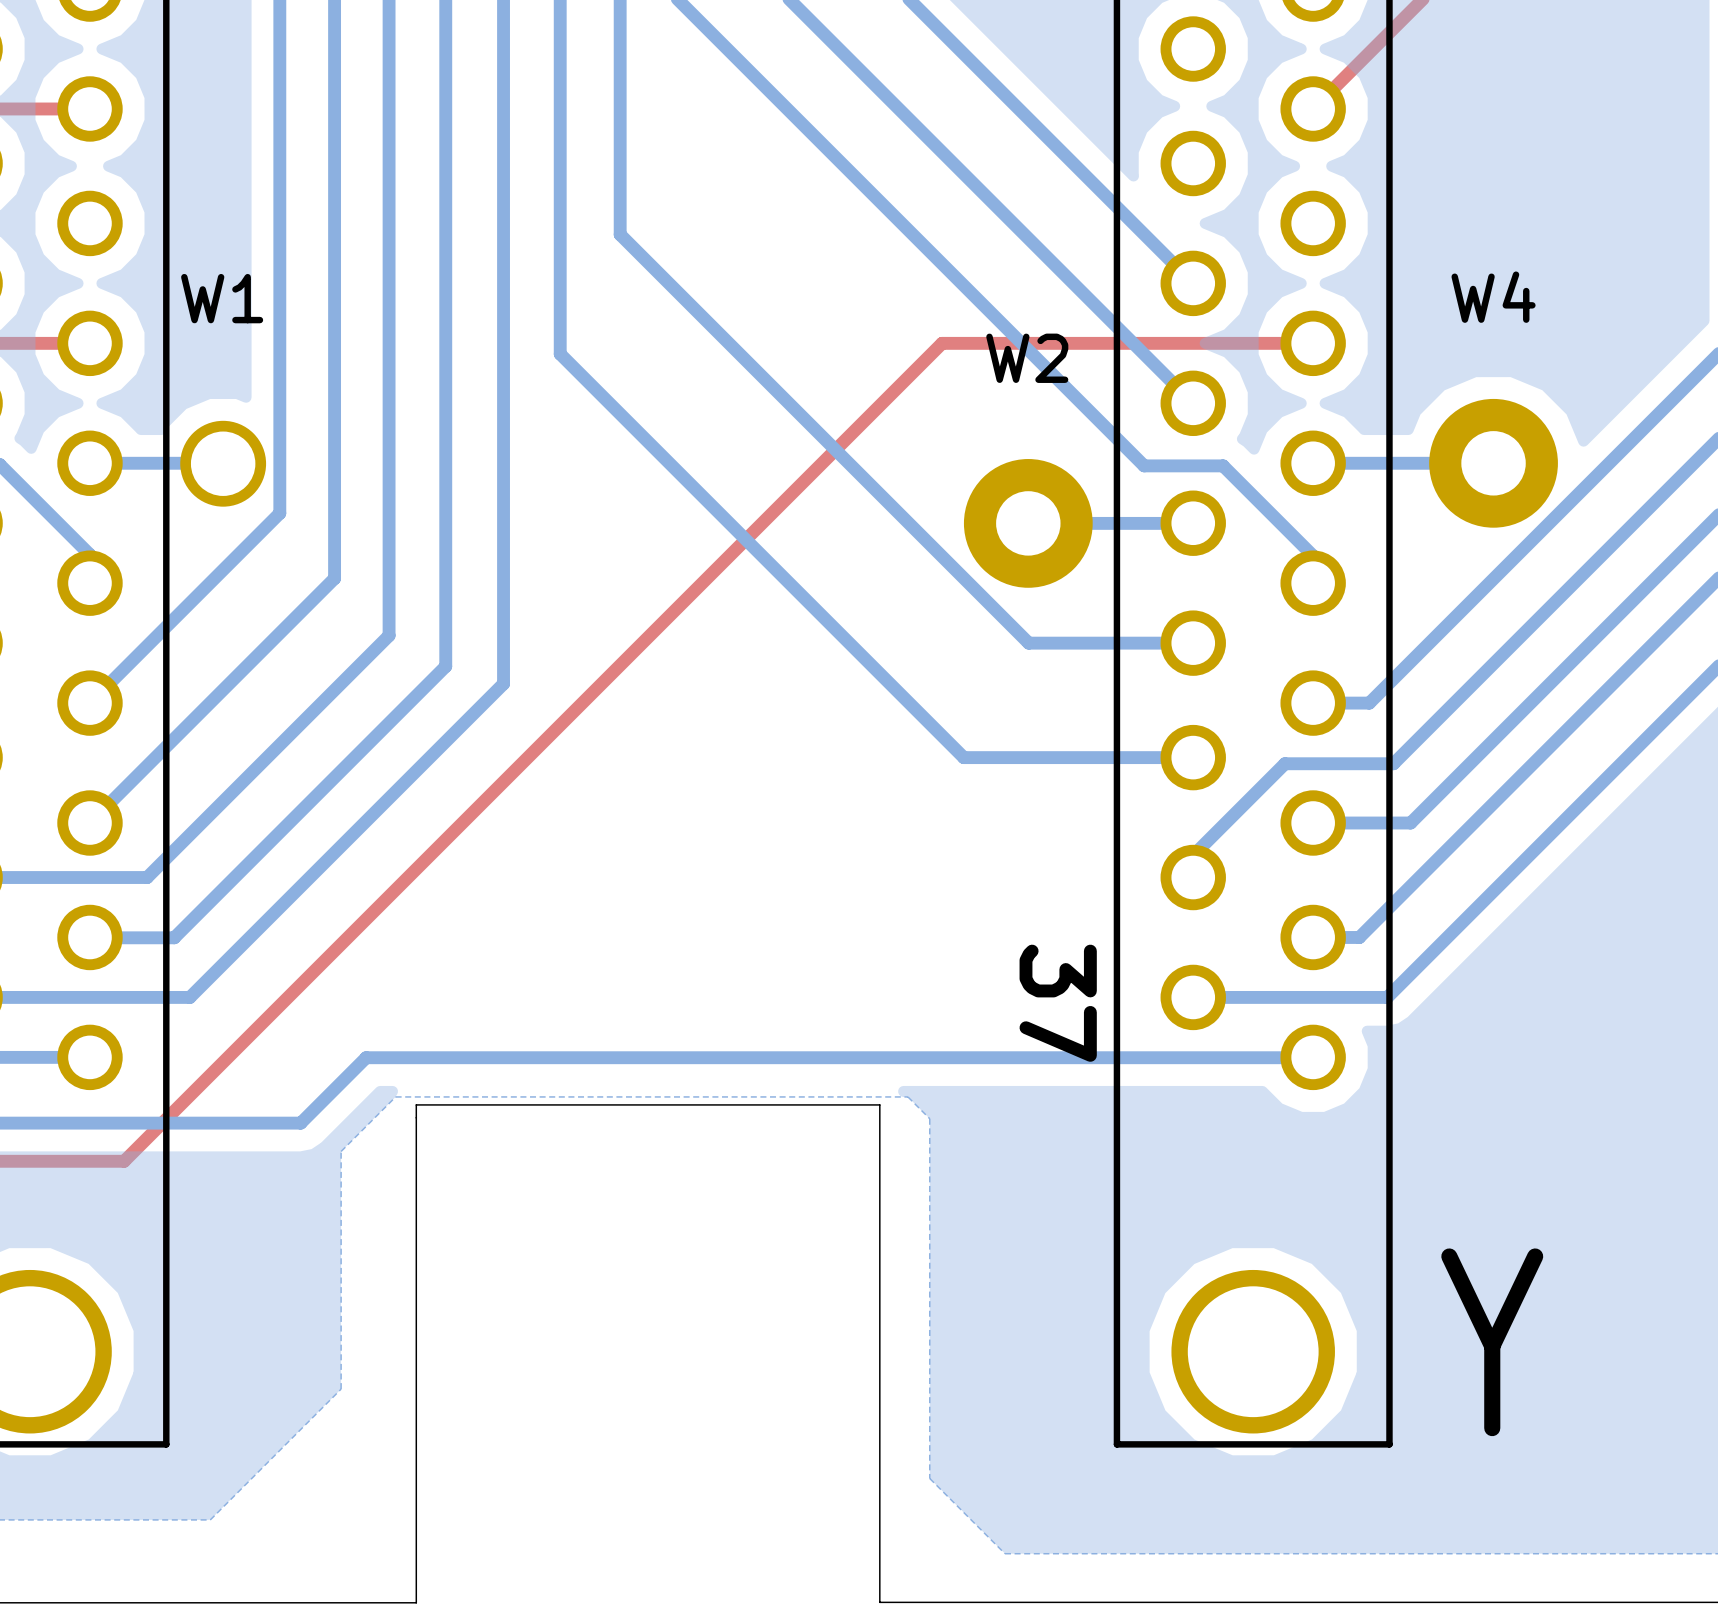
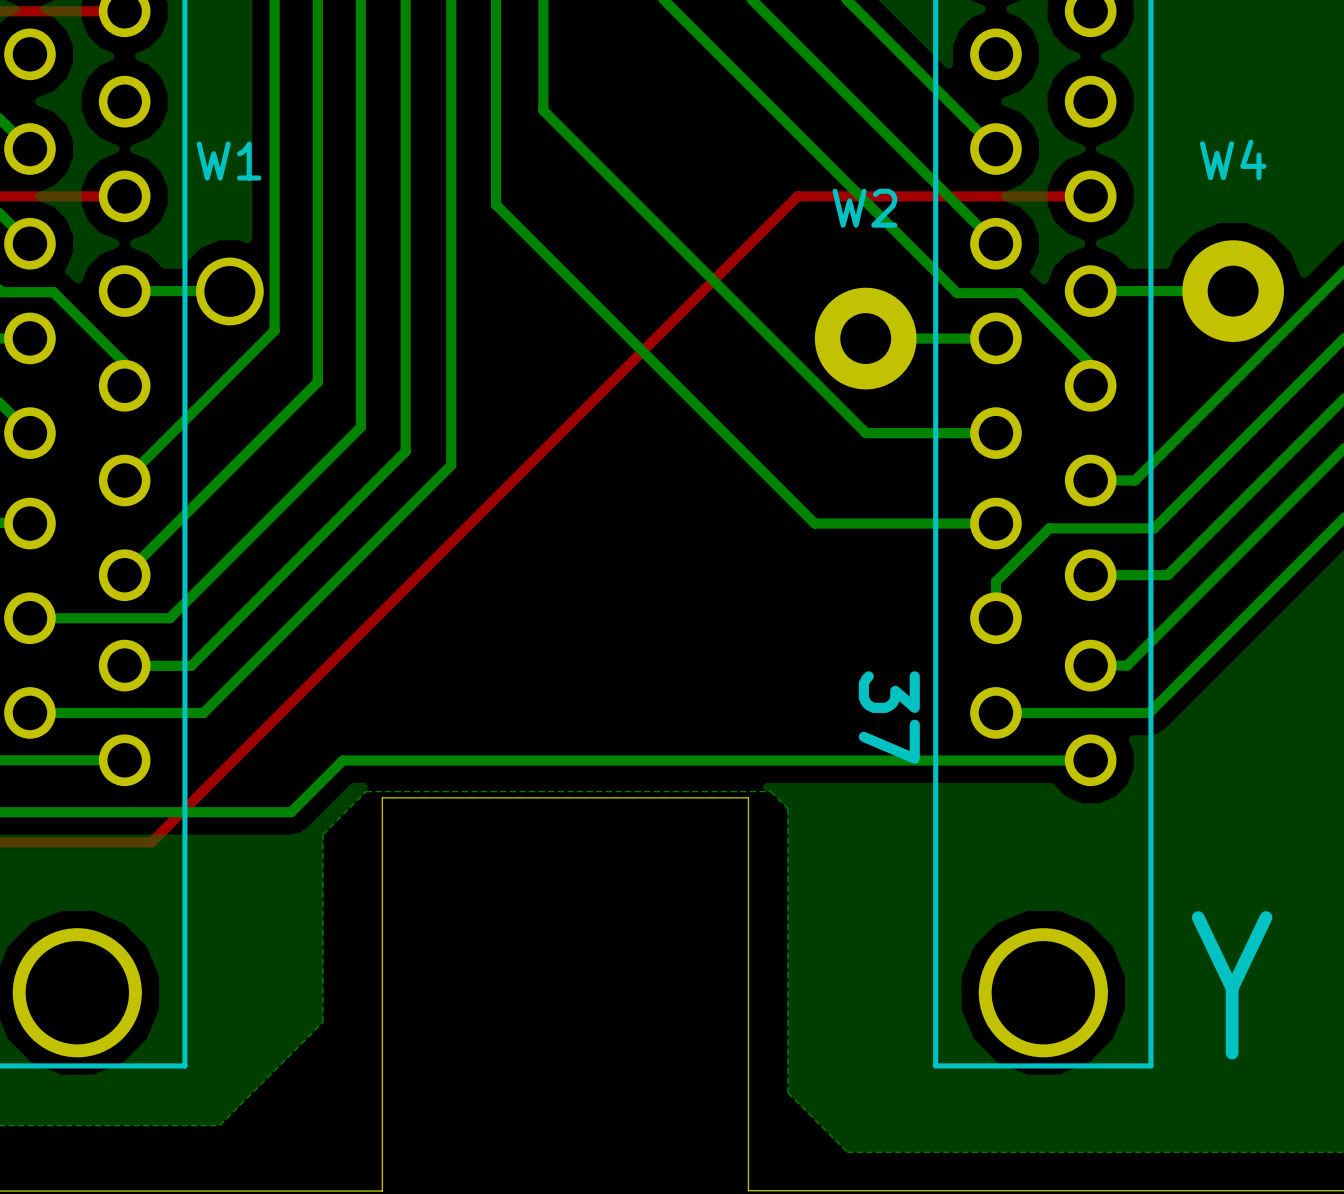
bottom track: (1284, 763) (1193, 855) -> (1068, 528) (1049, 528) (995, 581) (995, 600)

